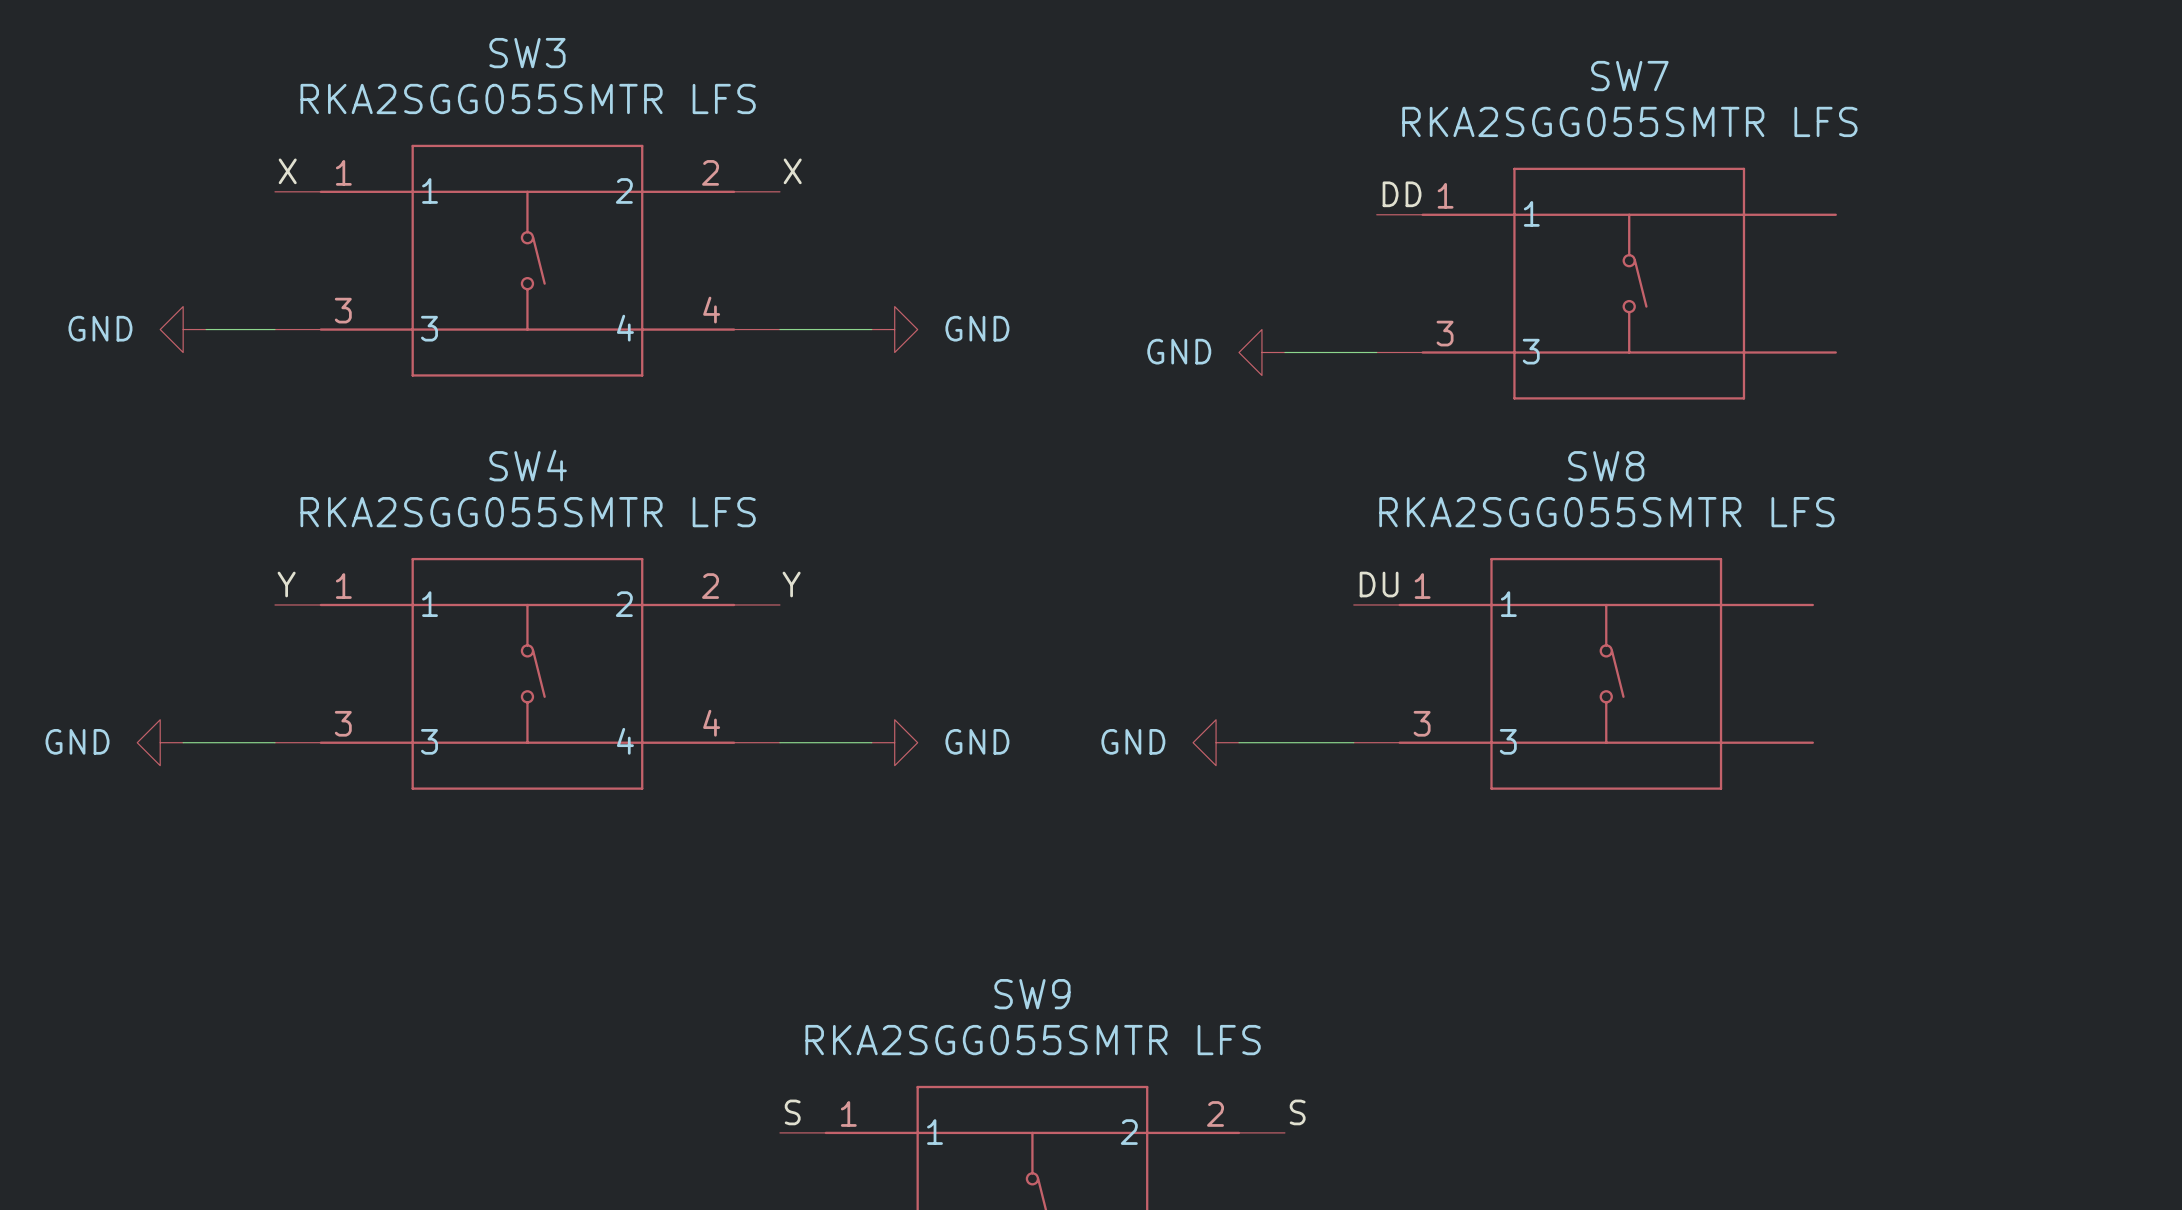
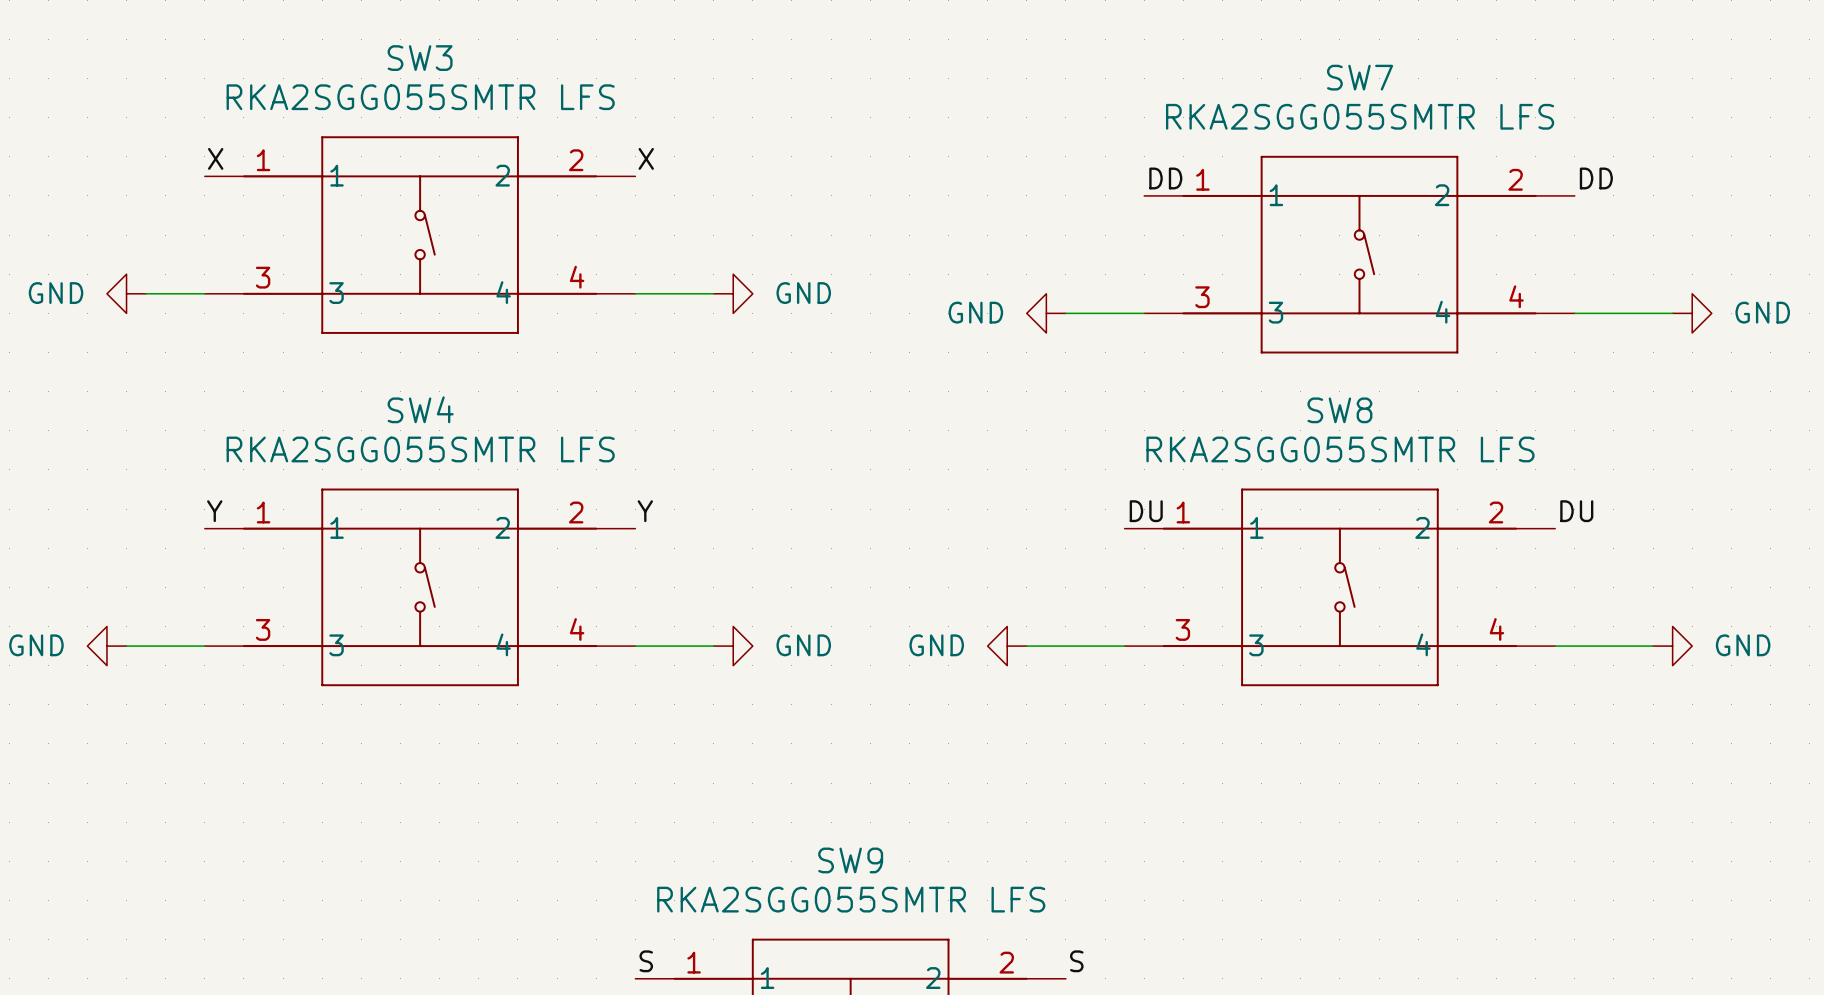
SW7 symbol: [1376, 167, 1837, 400] -> [1144, 155, 1575, 354]
label: none -> DD (1596, 178)
wire: none -> (1574, 313) (1672, 313)
power symbol: none -> GND (1692, 313)
SW8 symbol: [1353, 557, 1814, 790] -> [1124, 488, 1556, 687]
label: none -> DU (1576, 511)
wire: none -> (1555, 646) (1653, 646)
power symbol: none -> GND (1672, 646)

